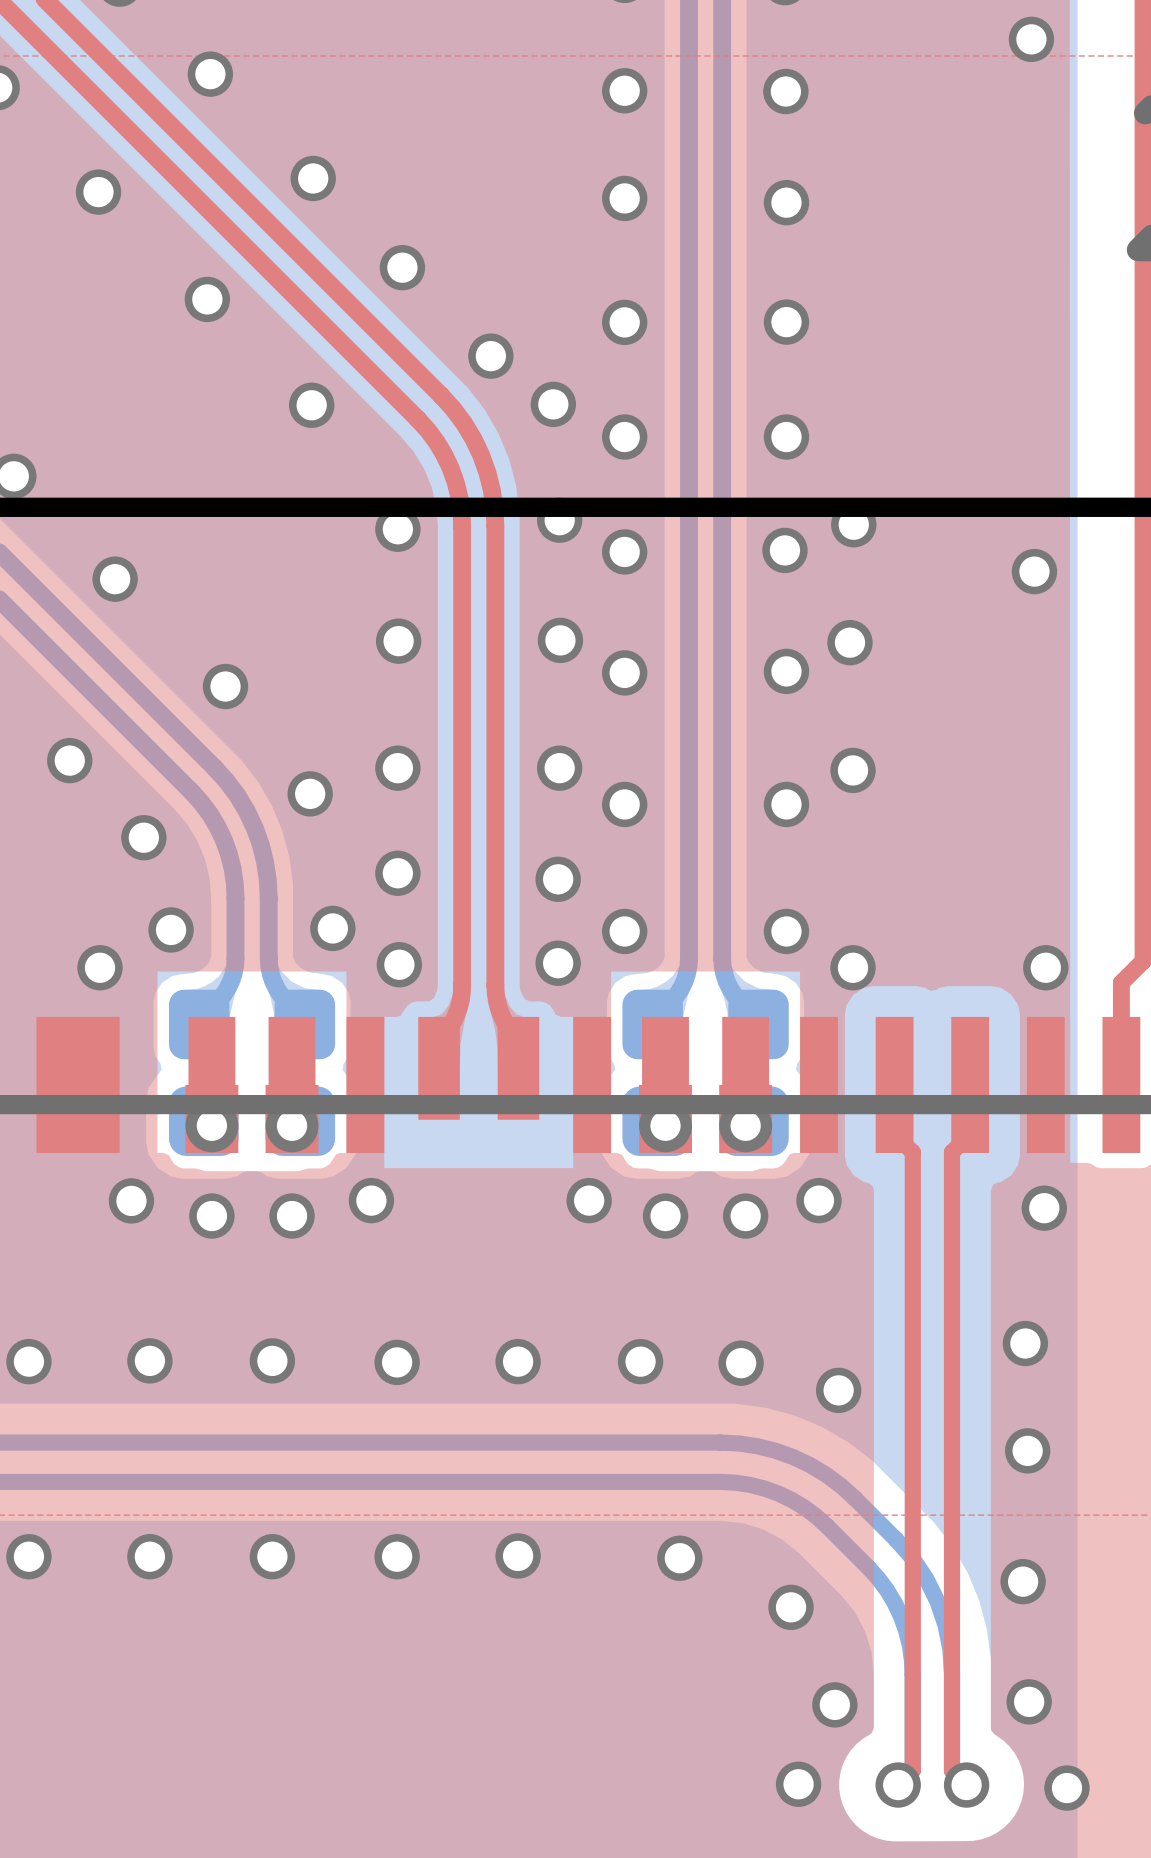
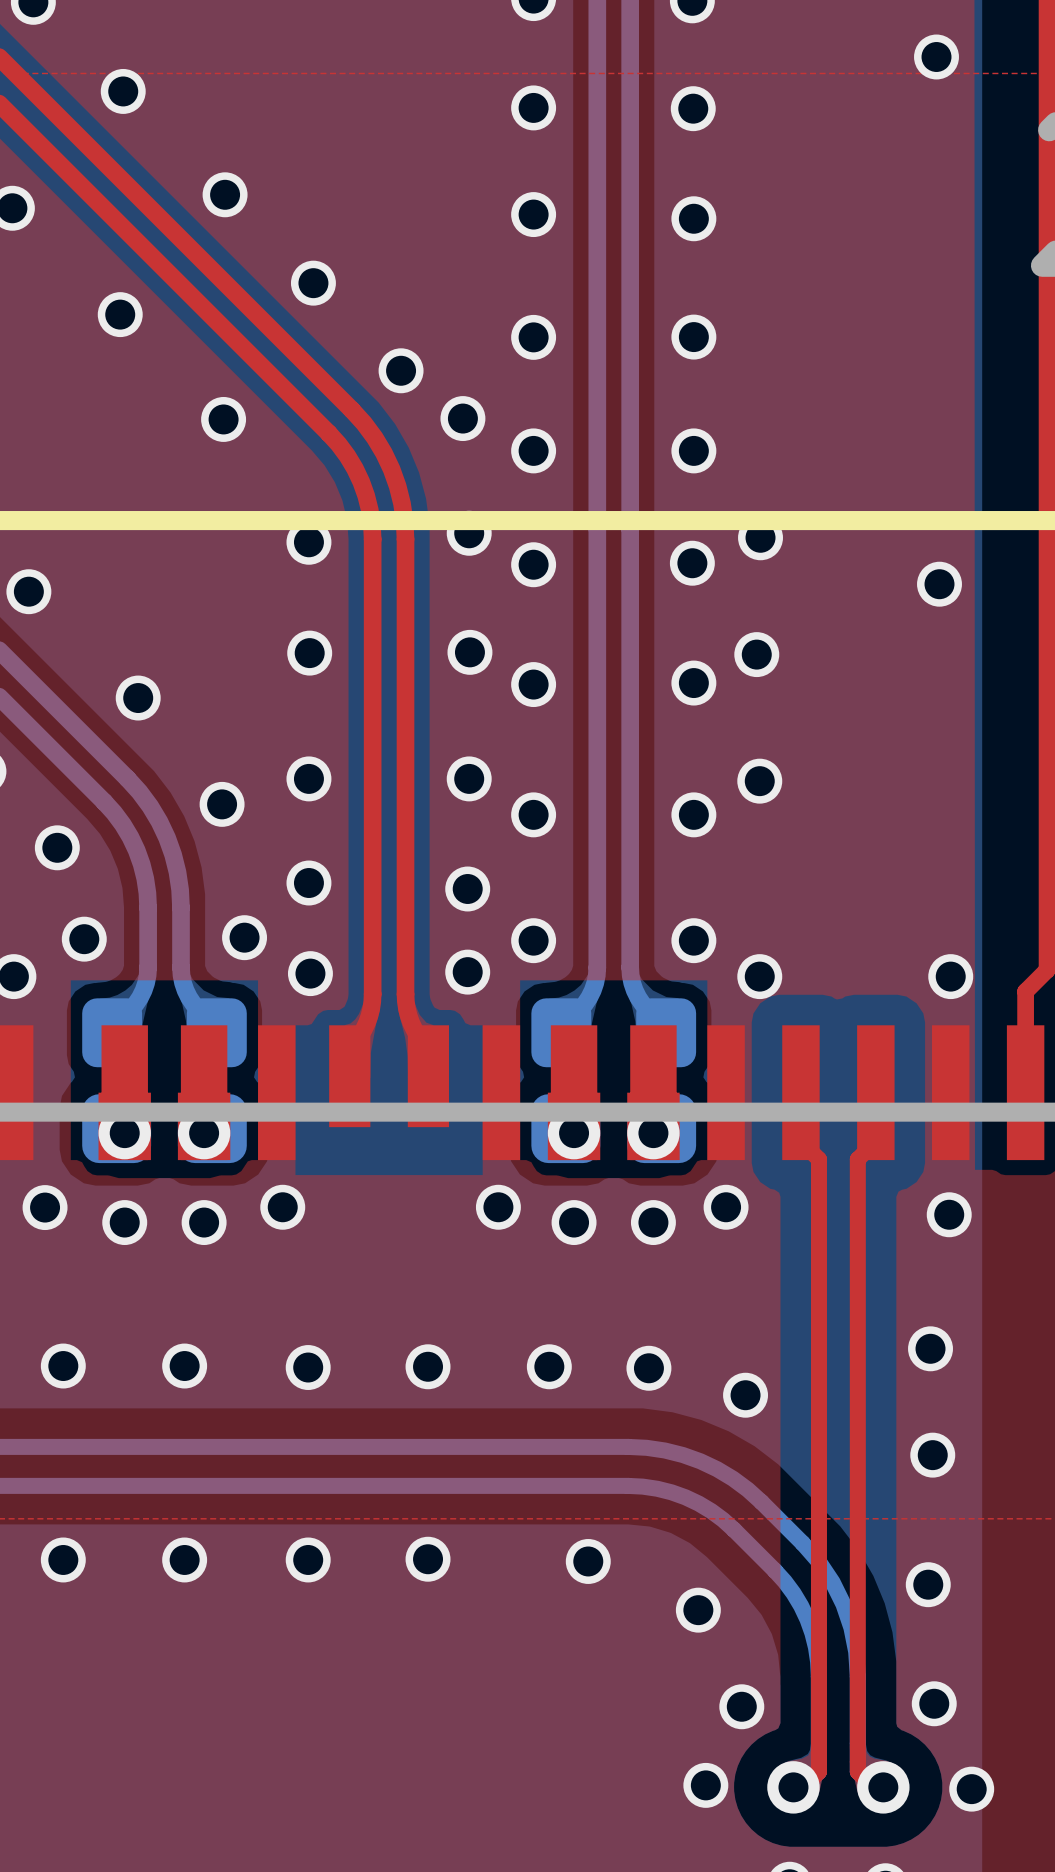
via size: [875, 1762, 921, 1808] -> [767, 1761, 820, 1814]
via size: [943, 1762, 990, 1808] -> [857, 1761, 910, 1814]

